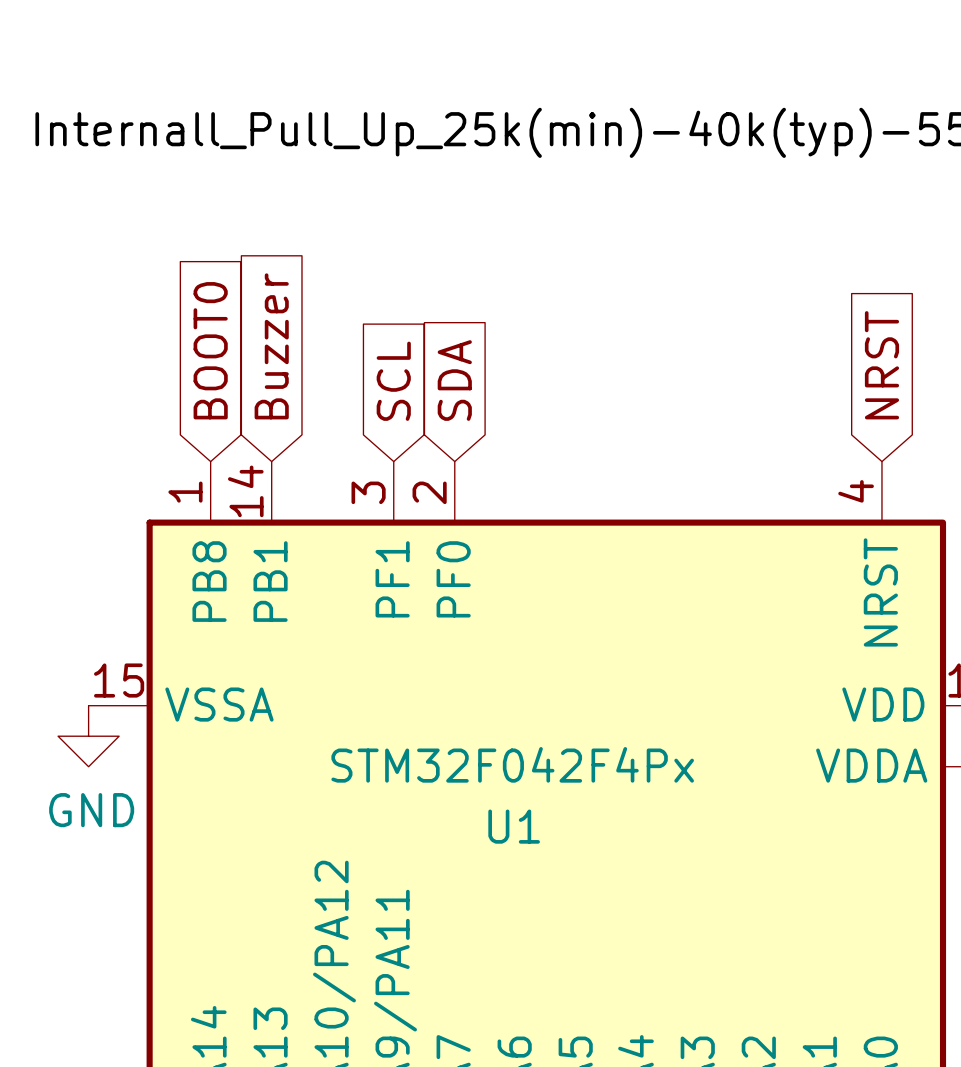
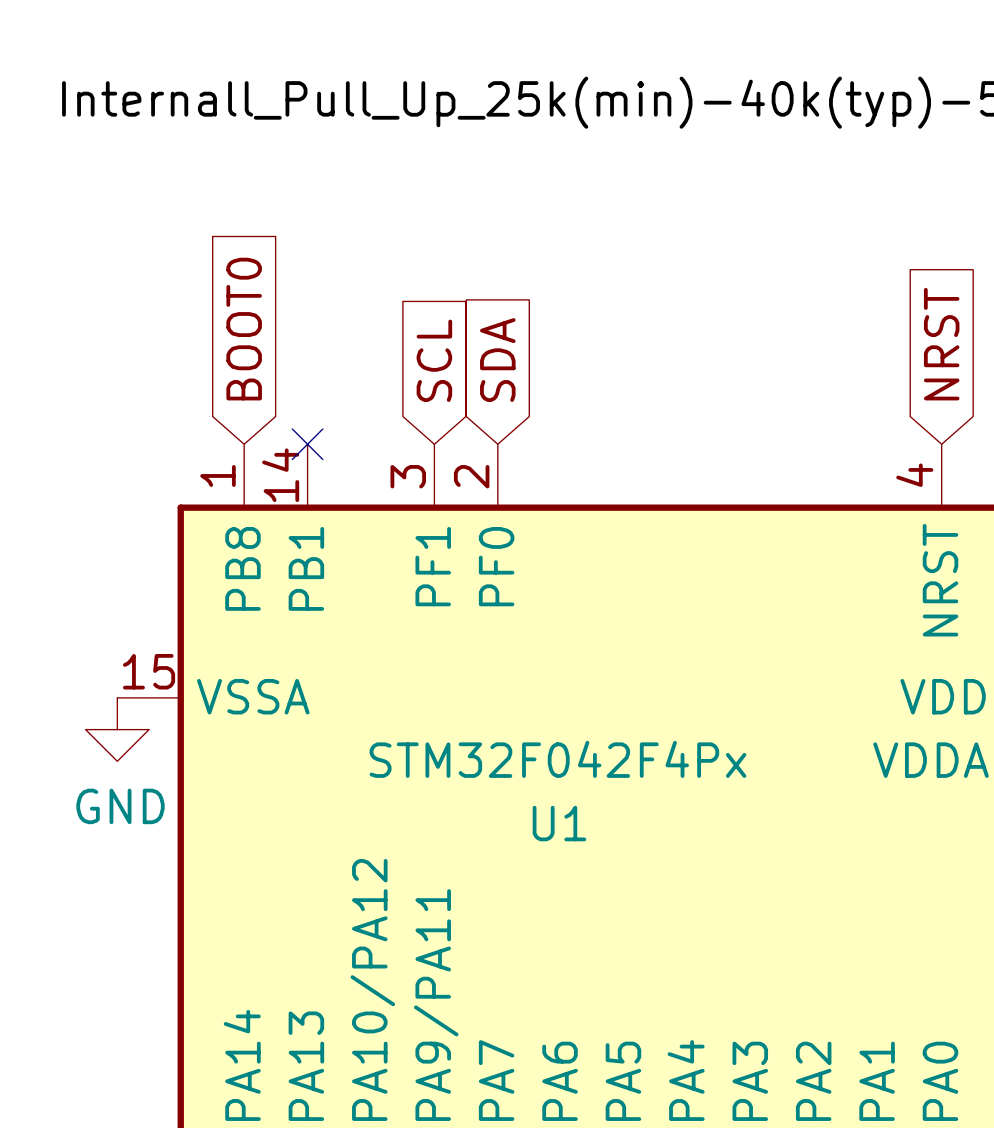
global label: Buzzer (271, 346) -> none
no-connect mark: none -> (307, 444)

